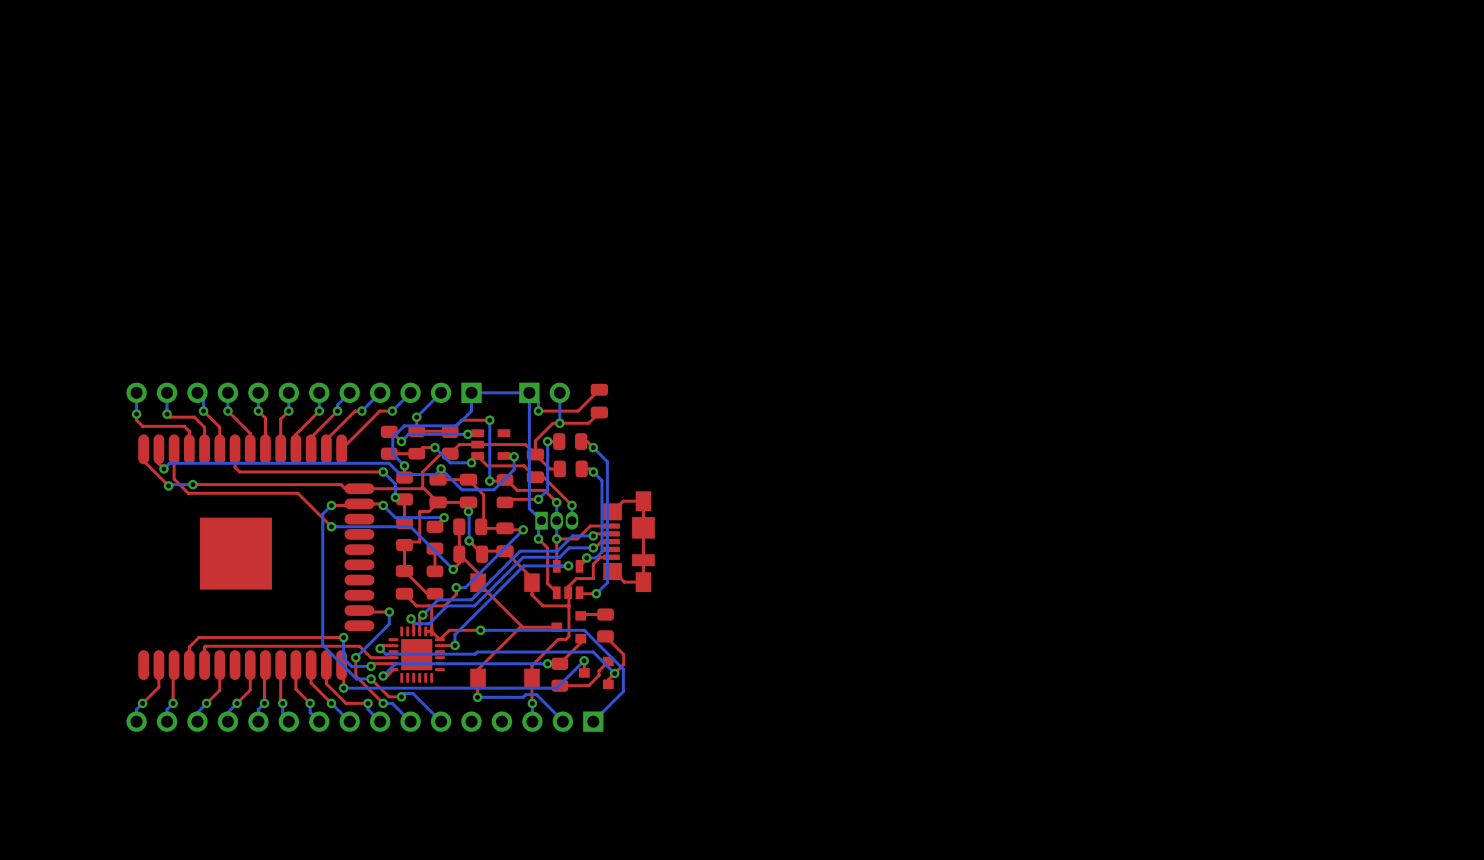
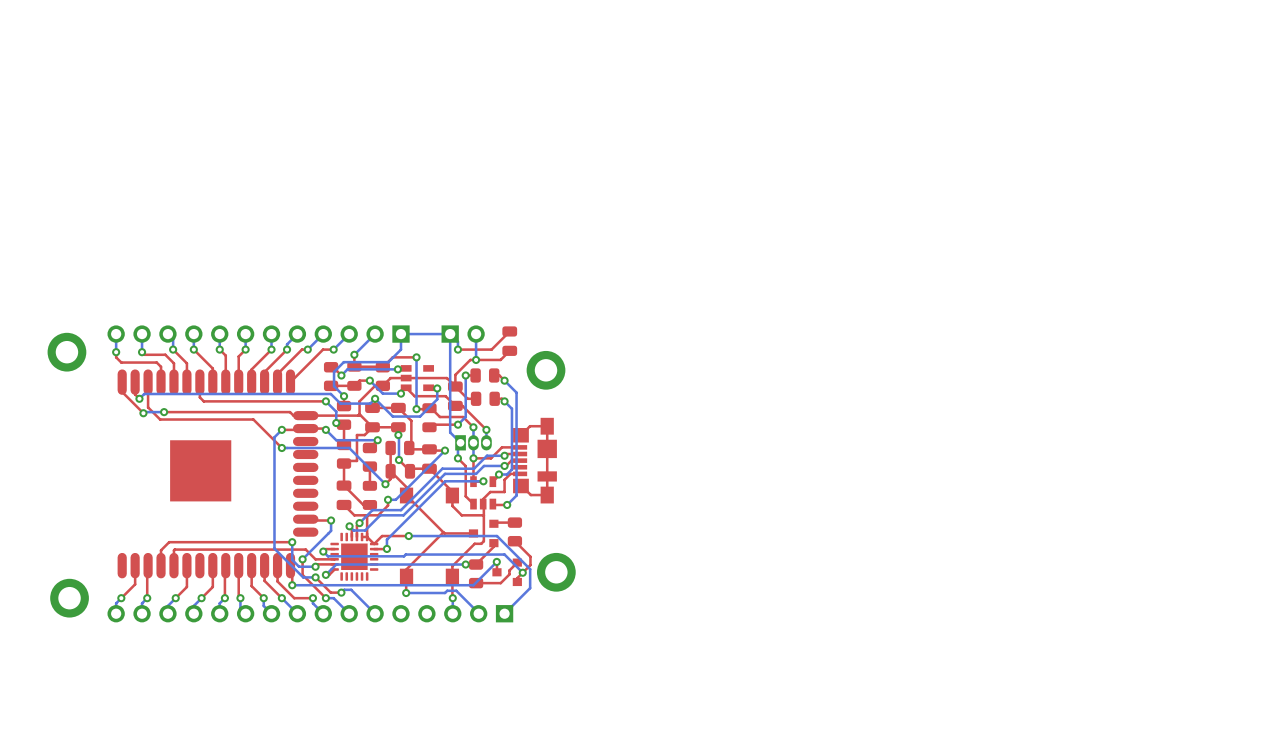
part: none -> (66, 352)
part: none -> (546, 370)
part: none -> (556, 572)
part: none -> (69, 598)

